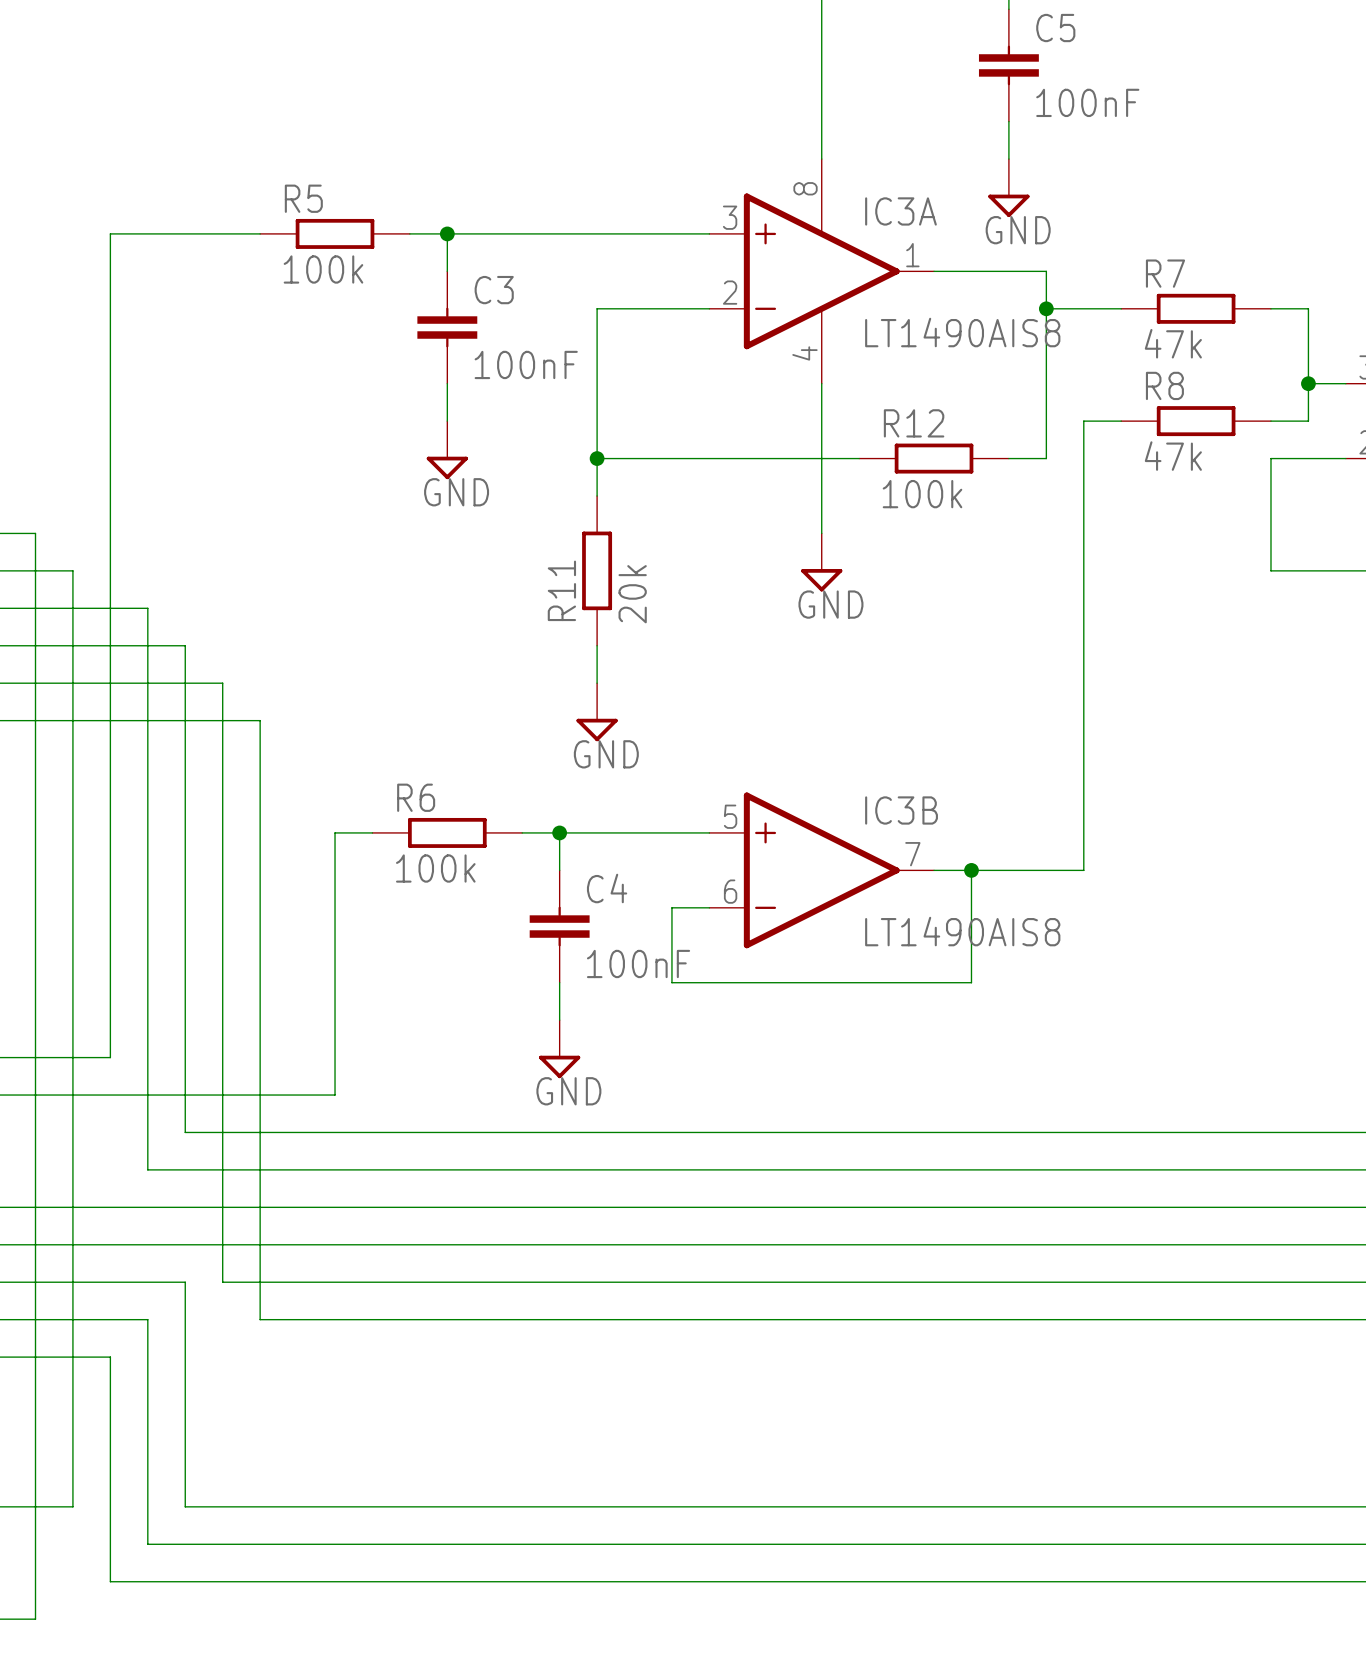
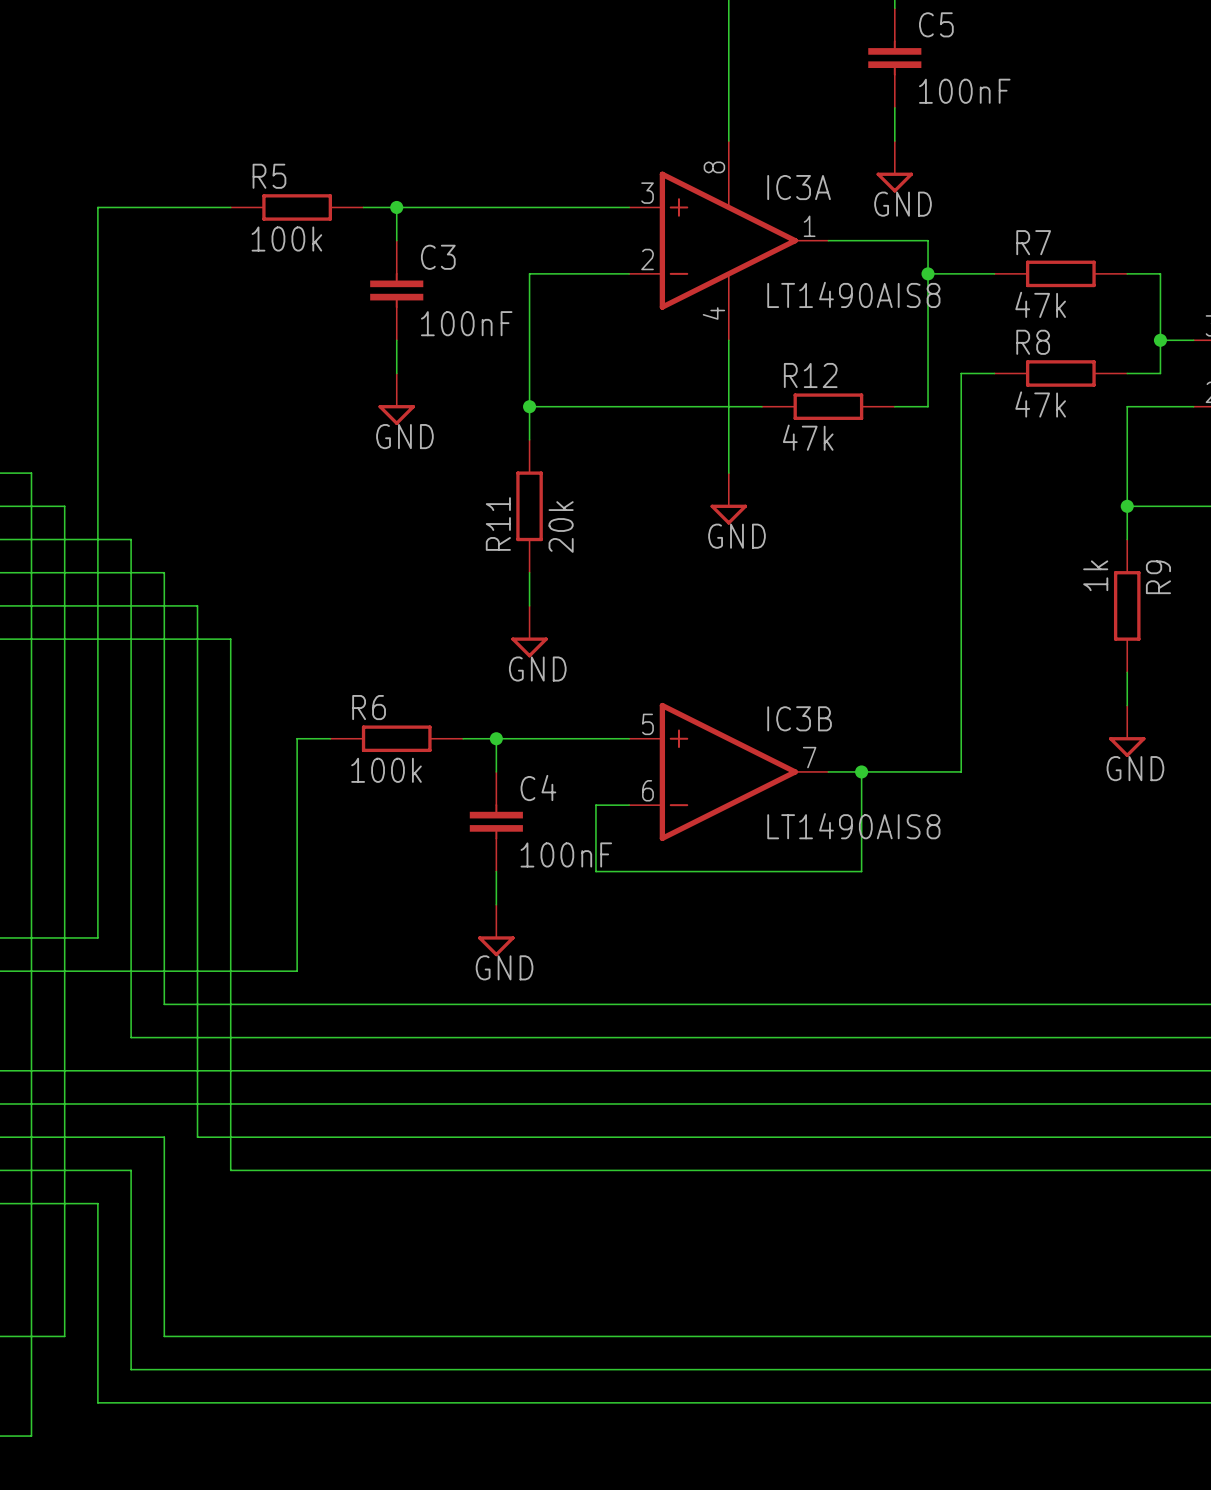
R12 value: 100k (922, 494) -> 47k (808, 437)
wire: none -> (1127, 506) (1127, 539)
junction: none -> (1127, 506)
R9: none -> 1k (1127, 605)
wire: none -> (1127, 672) (1127, 705)
power symbol: none -> GND (1127, 731)

